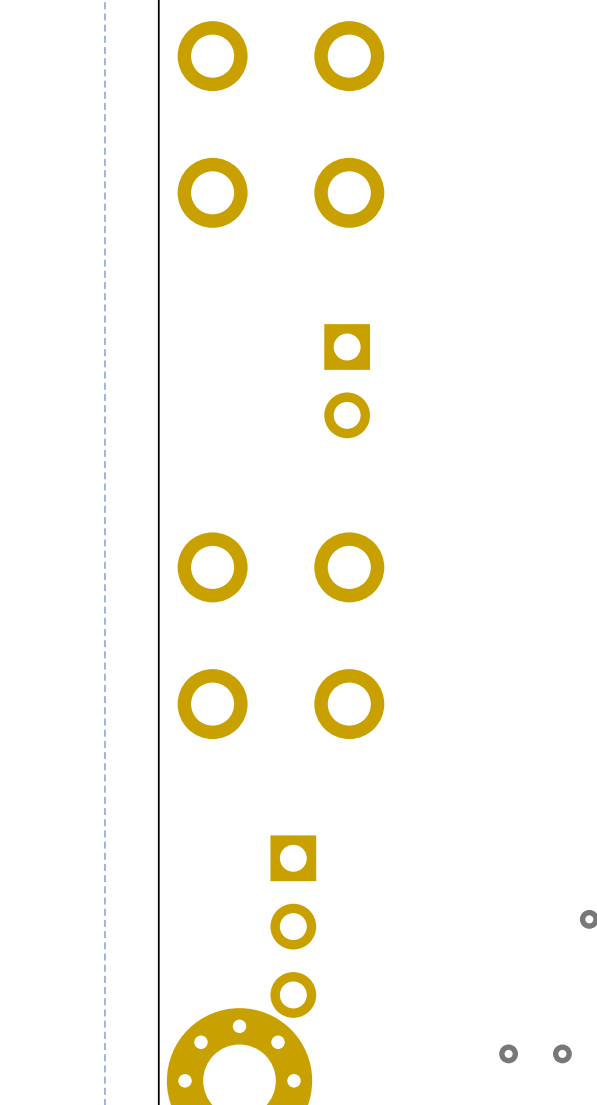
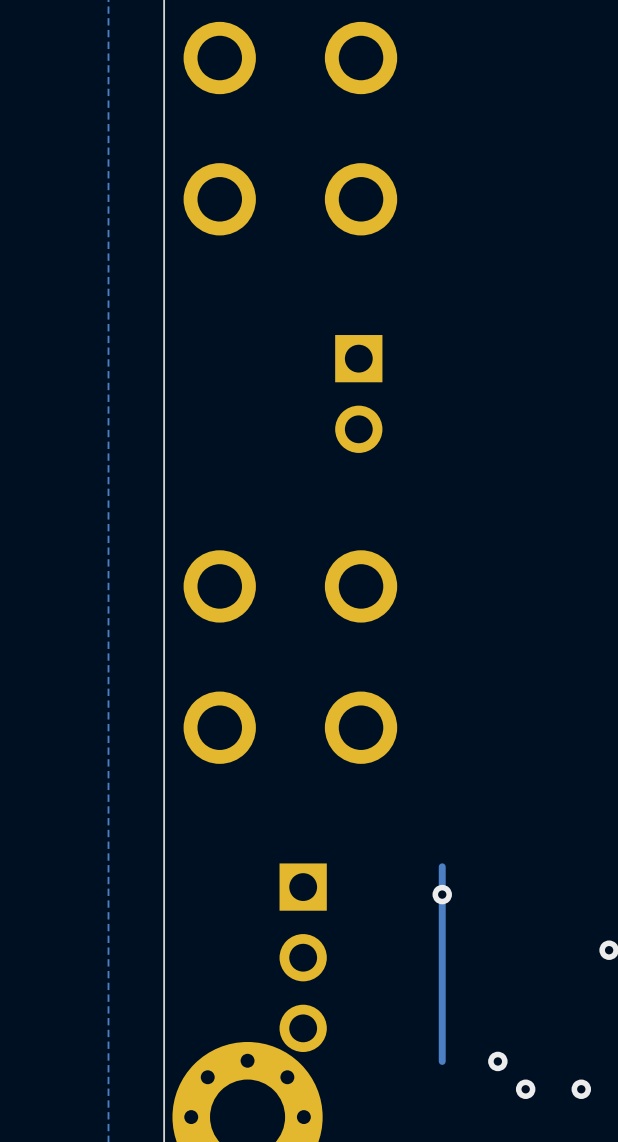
track: none -> (442, 866) (442, 1061)
via: none -> (442, 894)
via: none -> (497, 1061)

